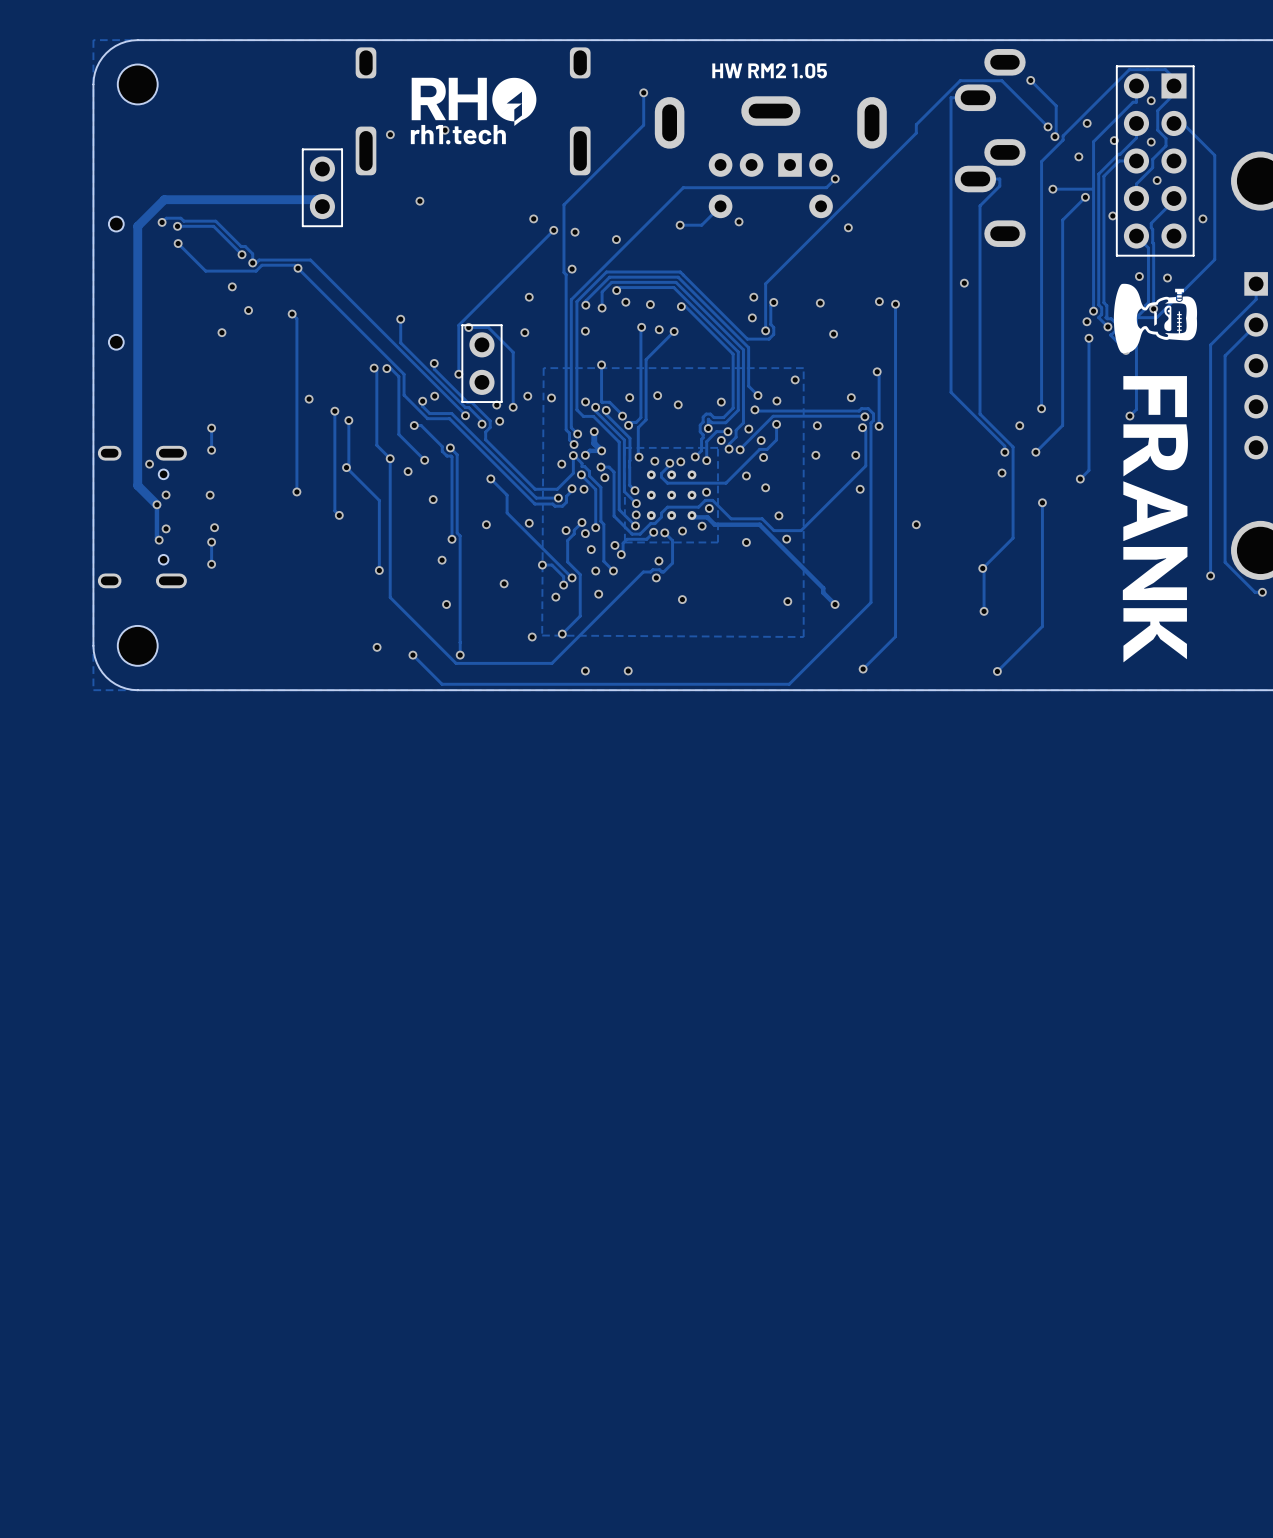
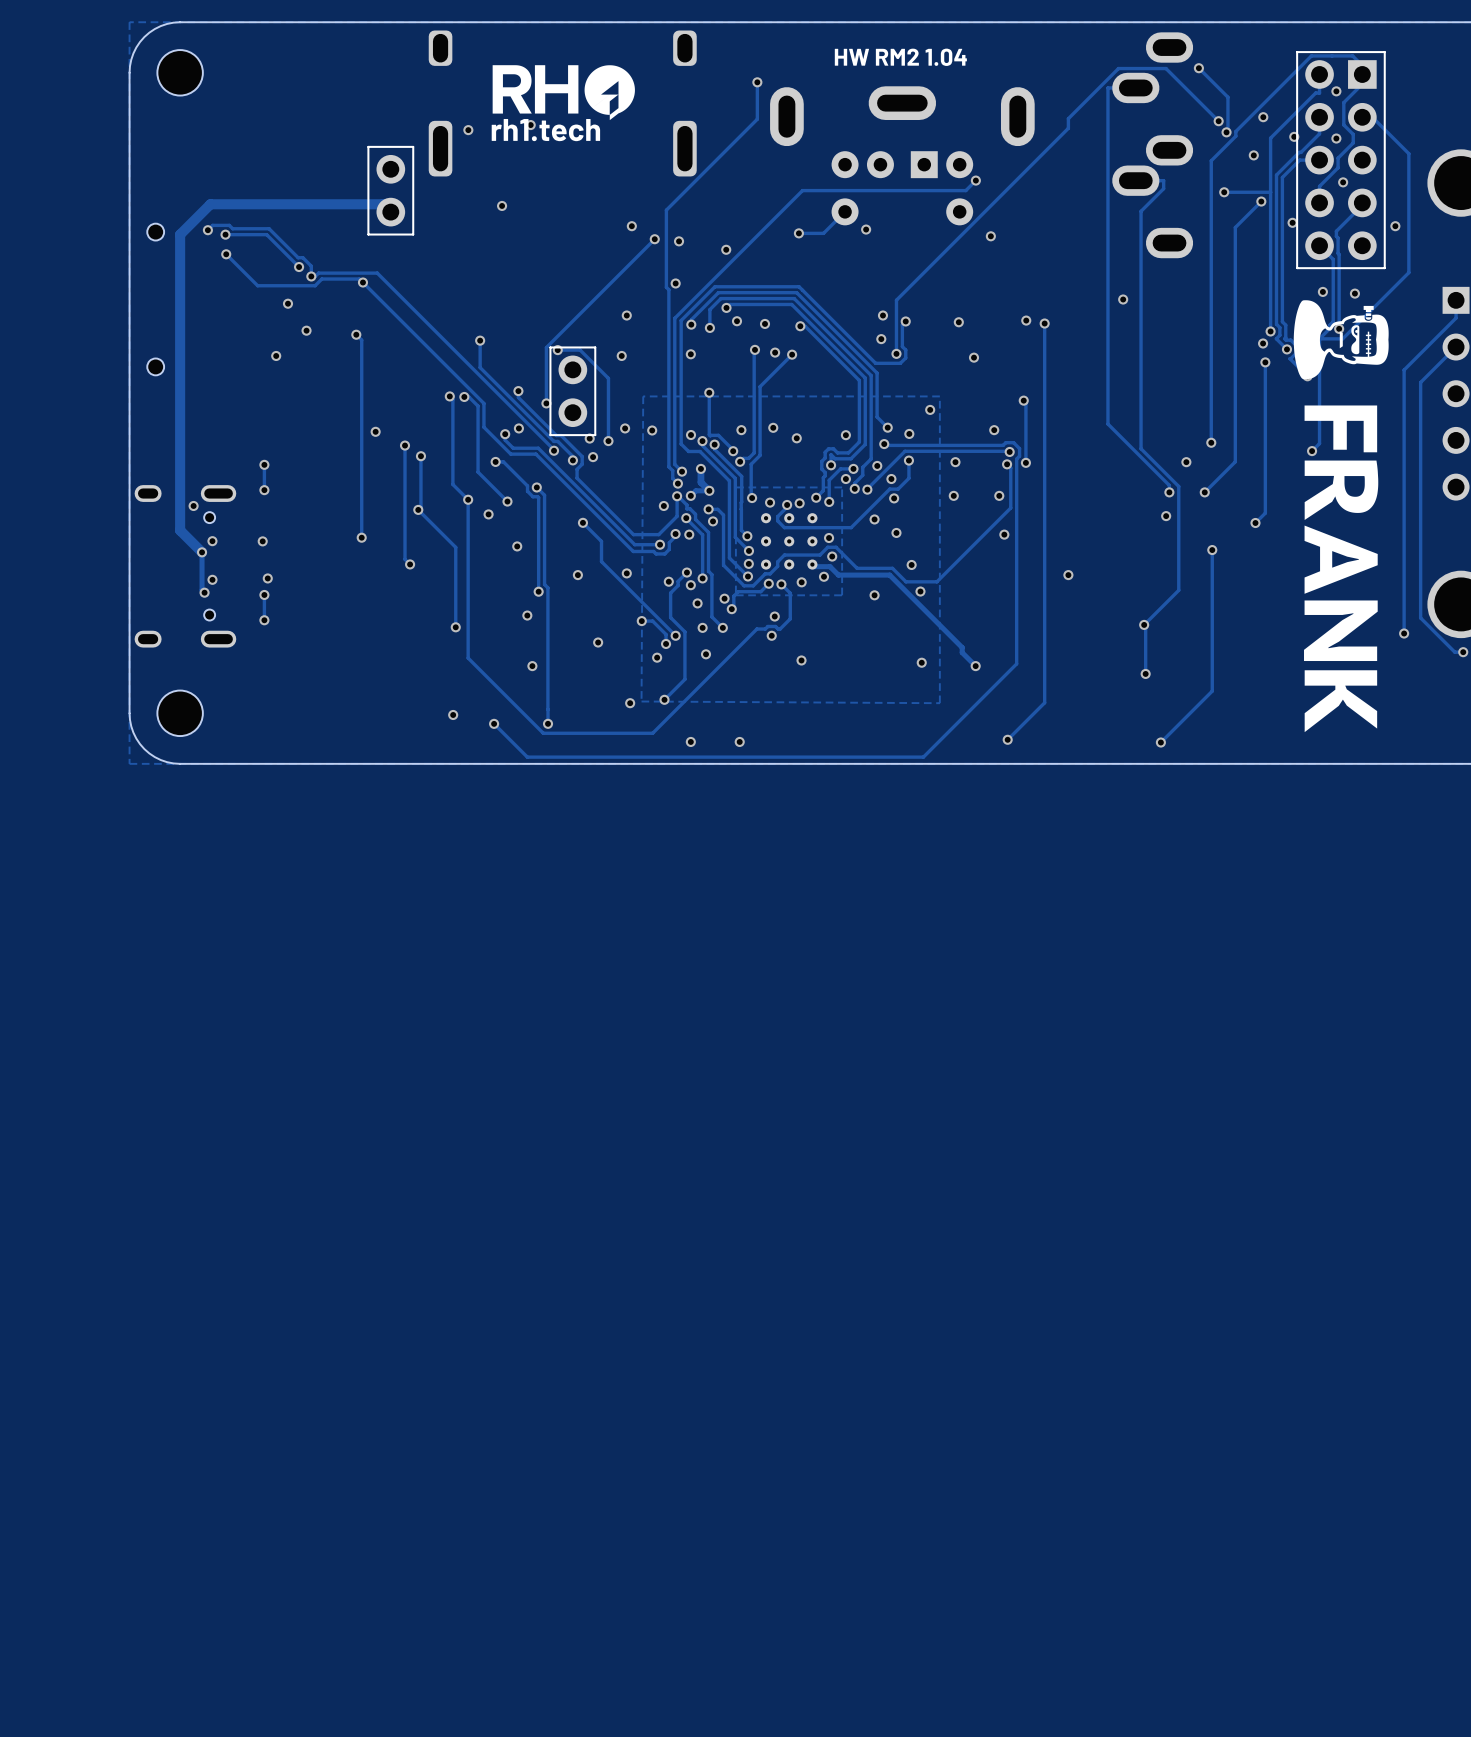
text: HW RM2 1.05 (769, 70) -> HW RM2 1.04 (900, 57)

